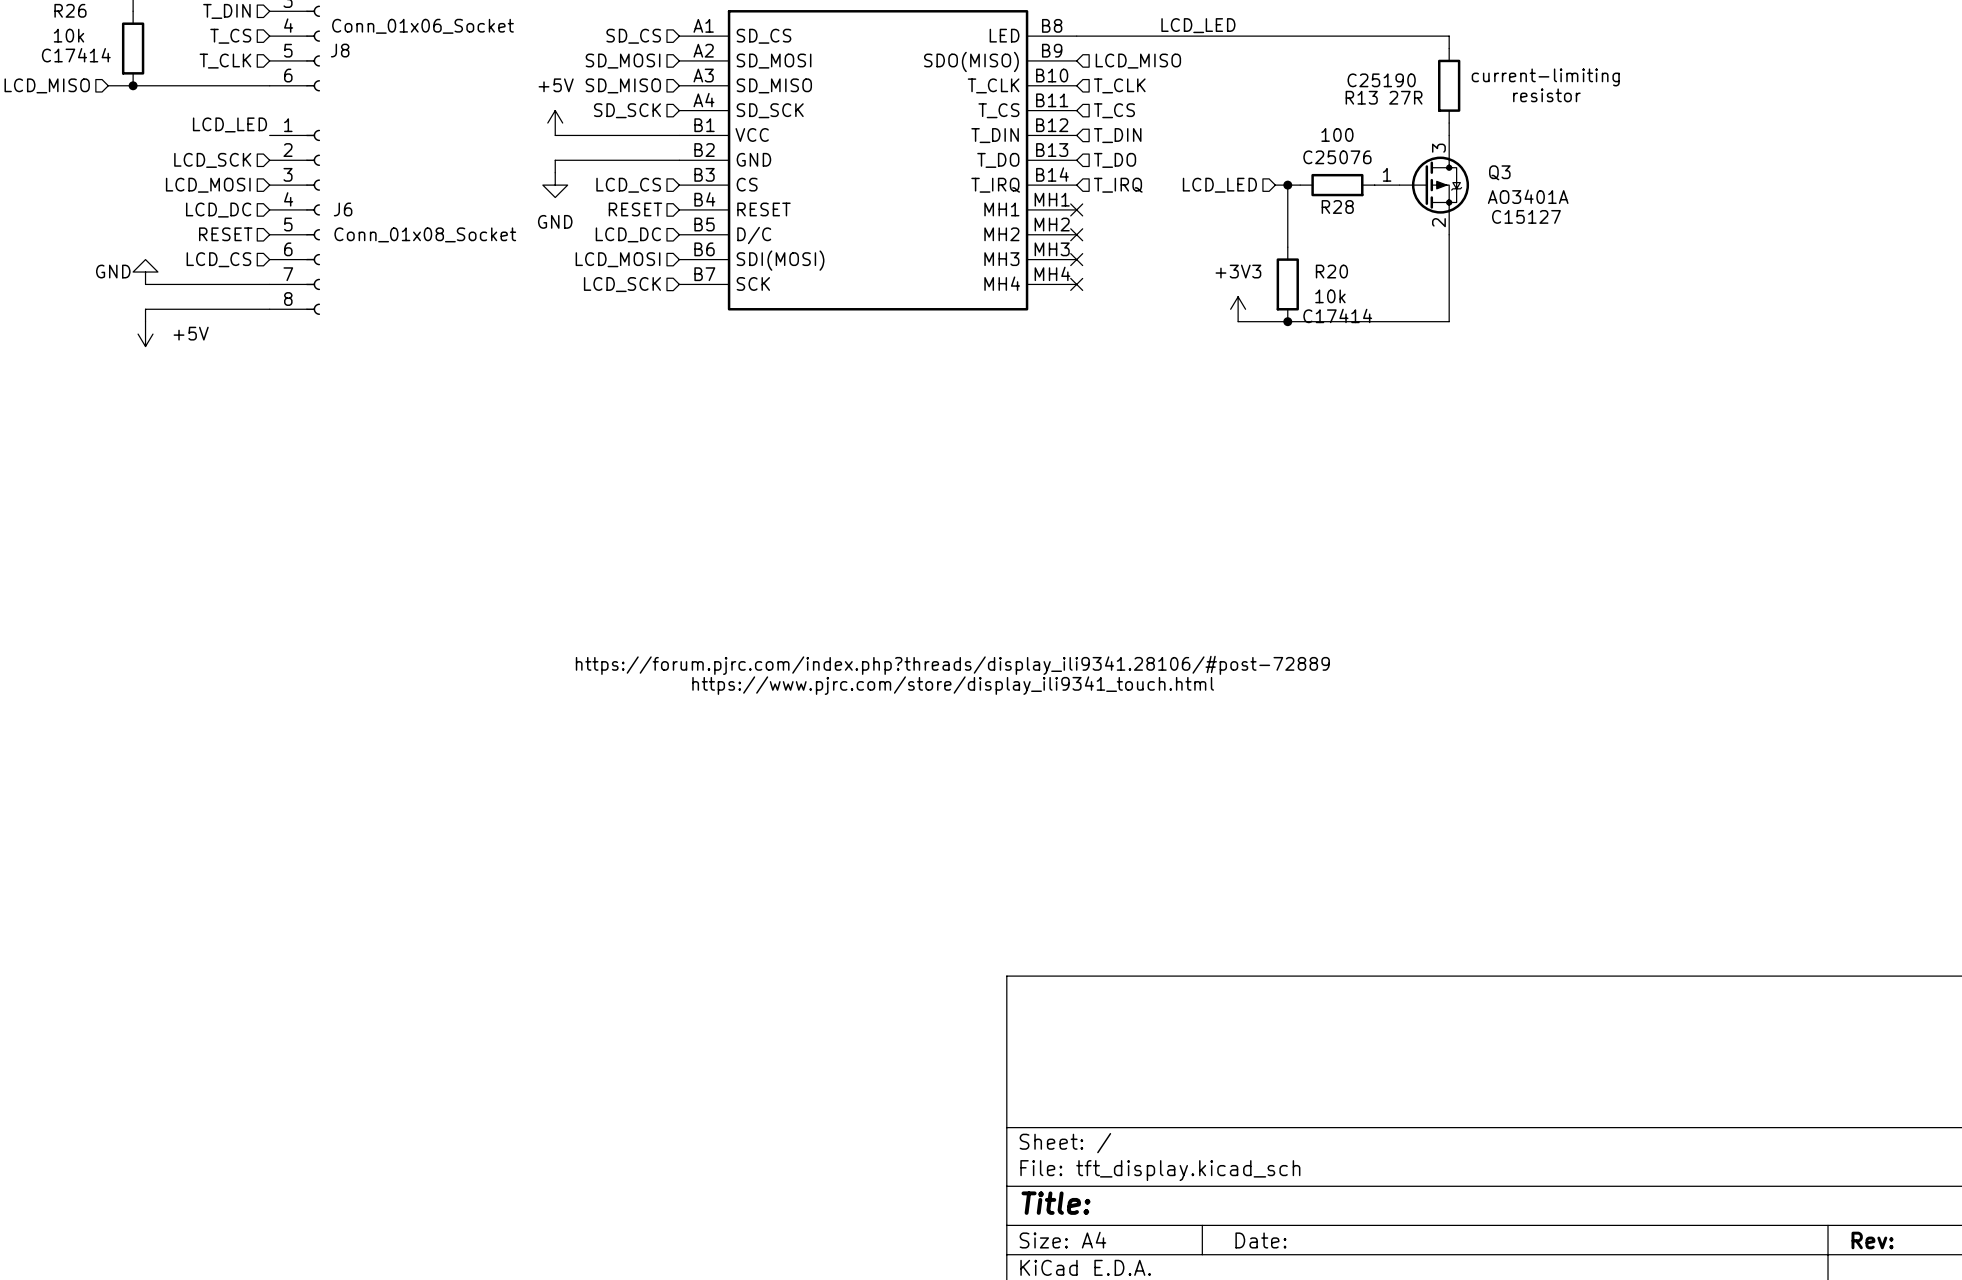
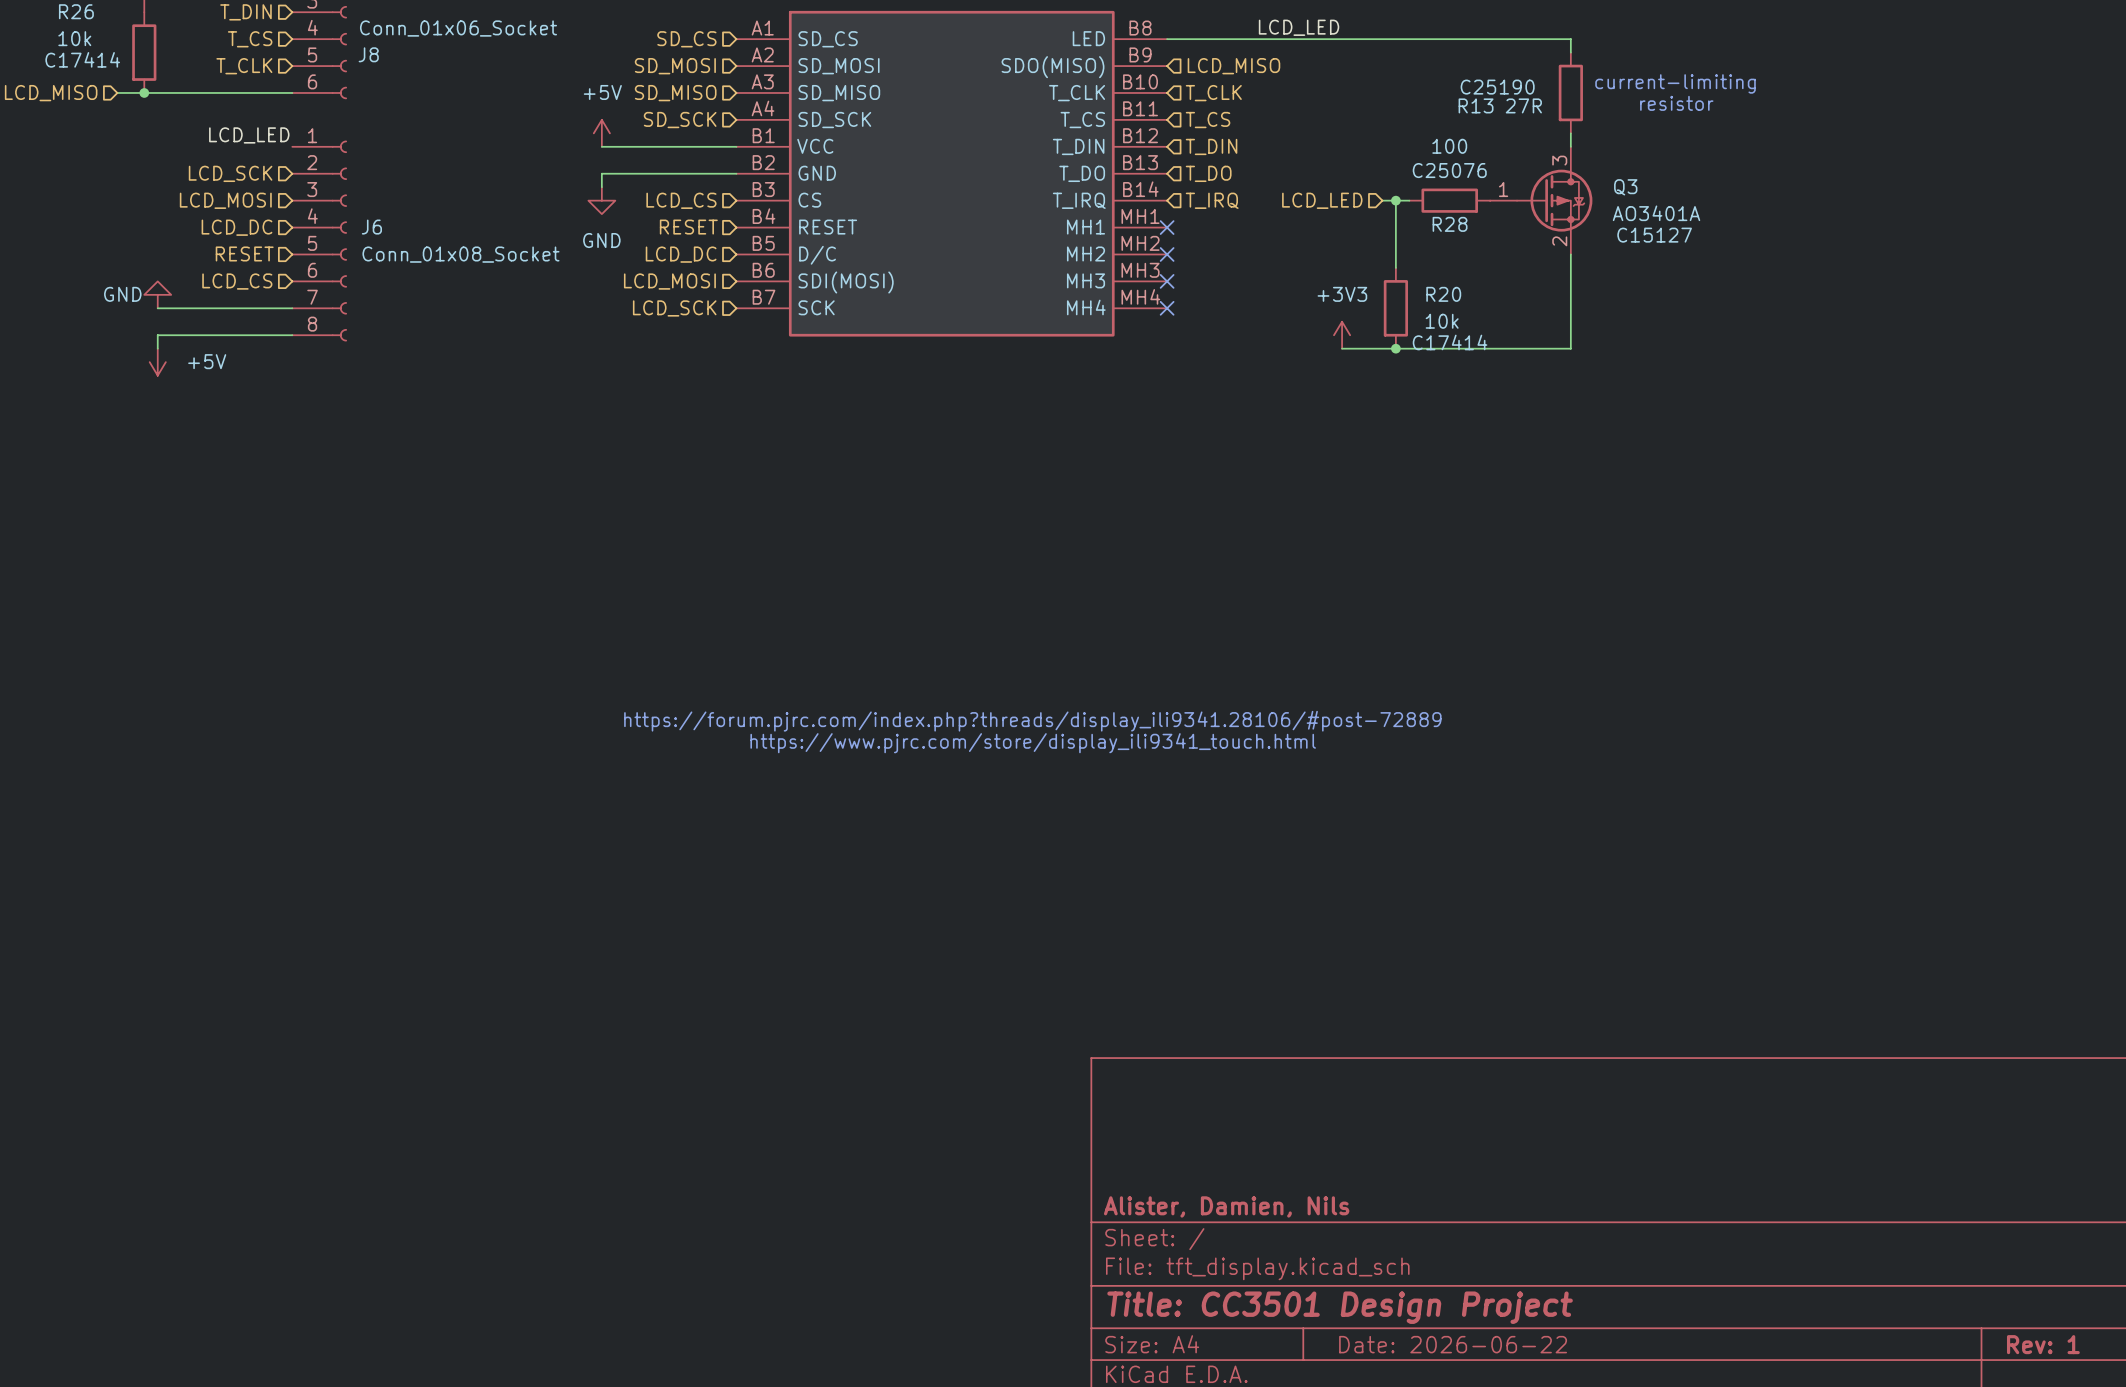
title block: none -> Alister, Damien, Nils (1226, 1206)
title block: Title: (1055, 1203) -> Title: CC3501 Design Project (1340, 1307)
title block: Date: (1260, 1240) -> Date: 2026-06-22 (1453, 1344)
title block: Rev: (1872, 1240) -> Rev: 1 (2043, 1344)

